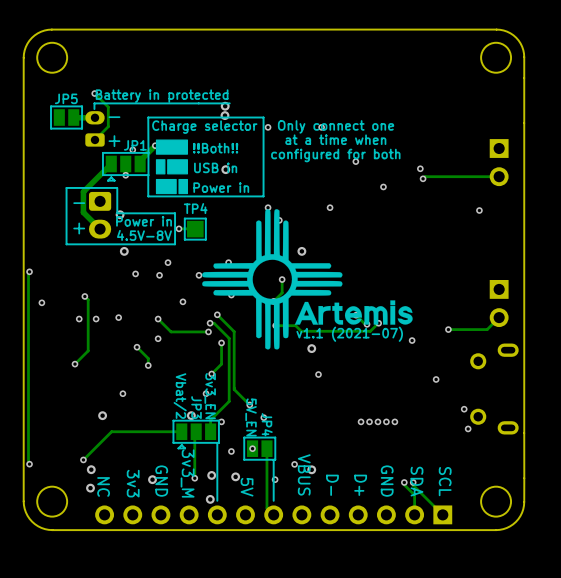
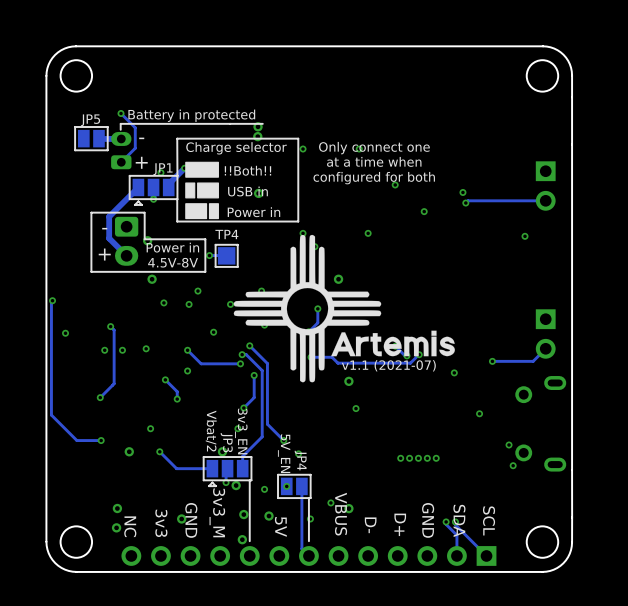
track: (28, 380) (29, 464) -> (51, 415) (76, 440) (101, 440)
via: none -> (101, 440)
via: none -> (159, 451)
via: (221, 421) -> none
track: (147, 431) (111, 431) (83, 459) -> (176, 468) (159, 451)
track: (194, 445) (194, 478) -> none
via: none -> (226, 482)
via: none -> (236, 485)
via: (83, 459) -> none
via: (29, 464) -> none
via: (194, 478) -> none

